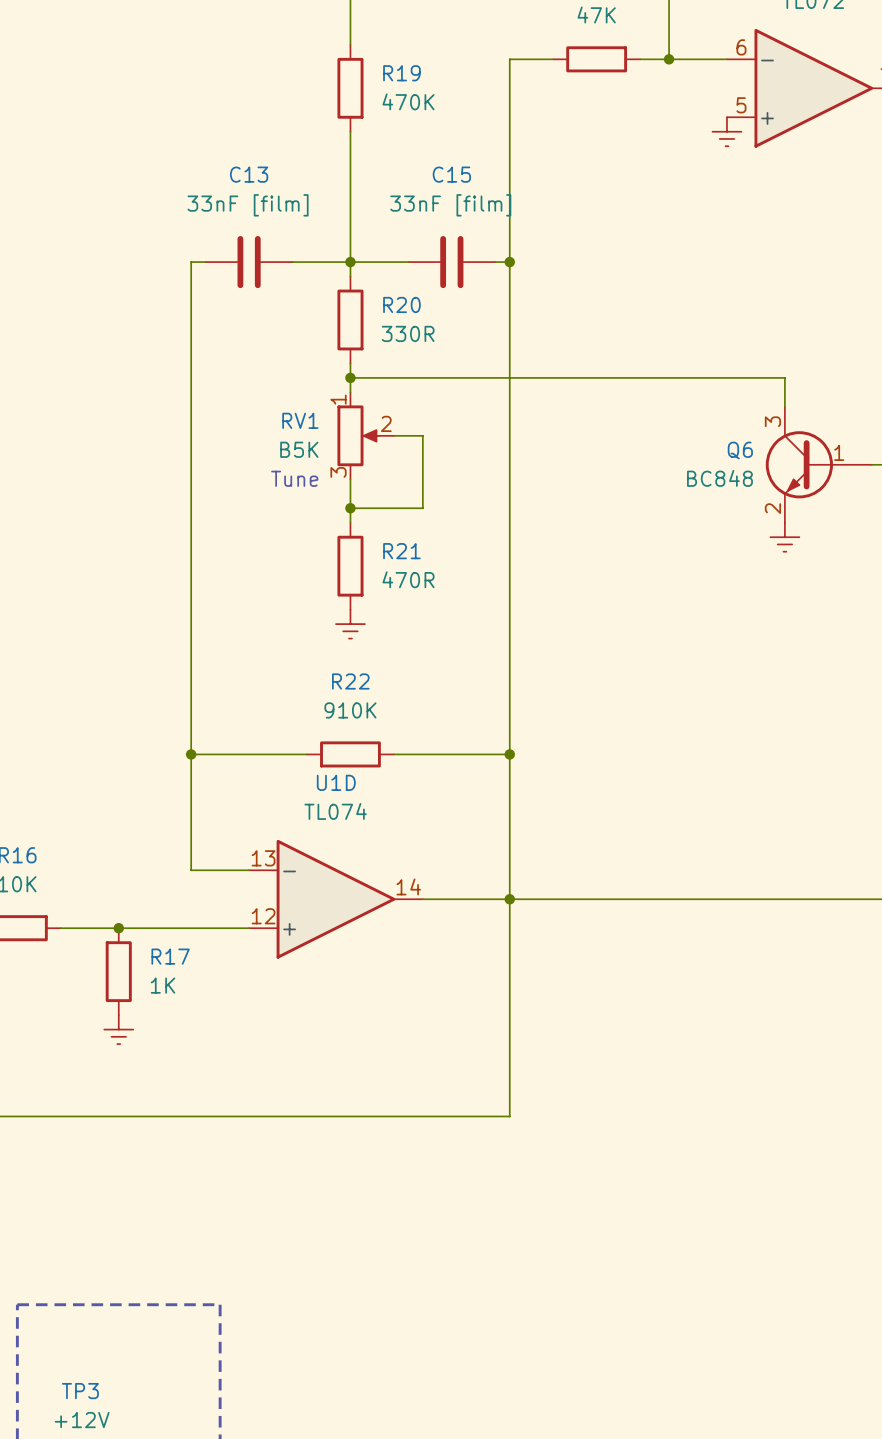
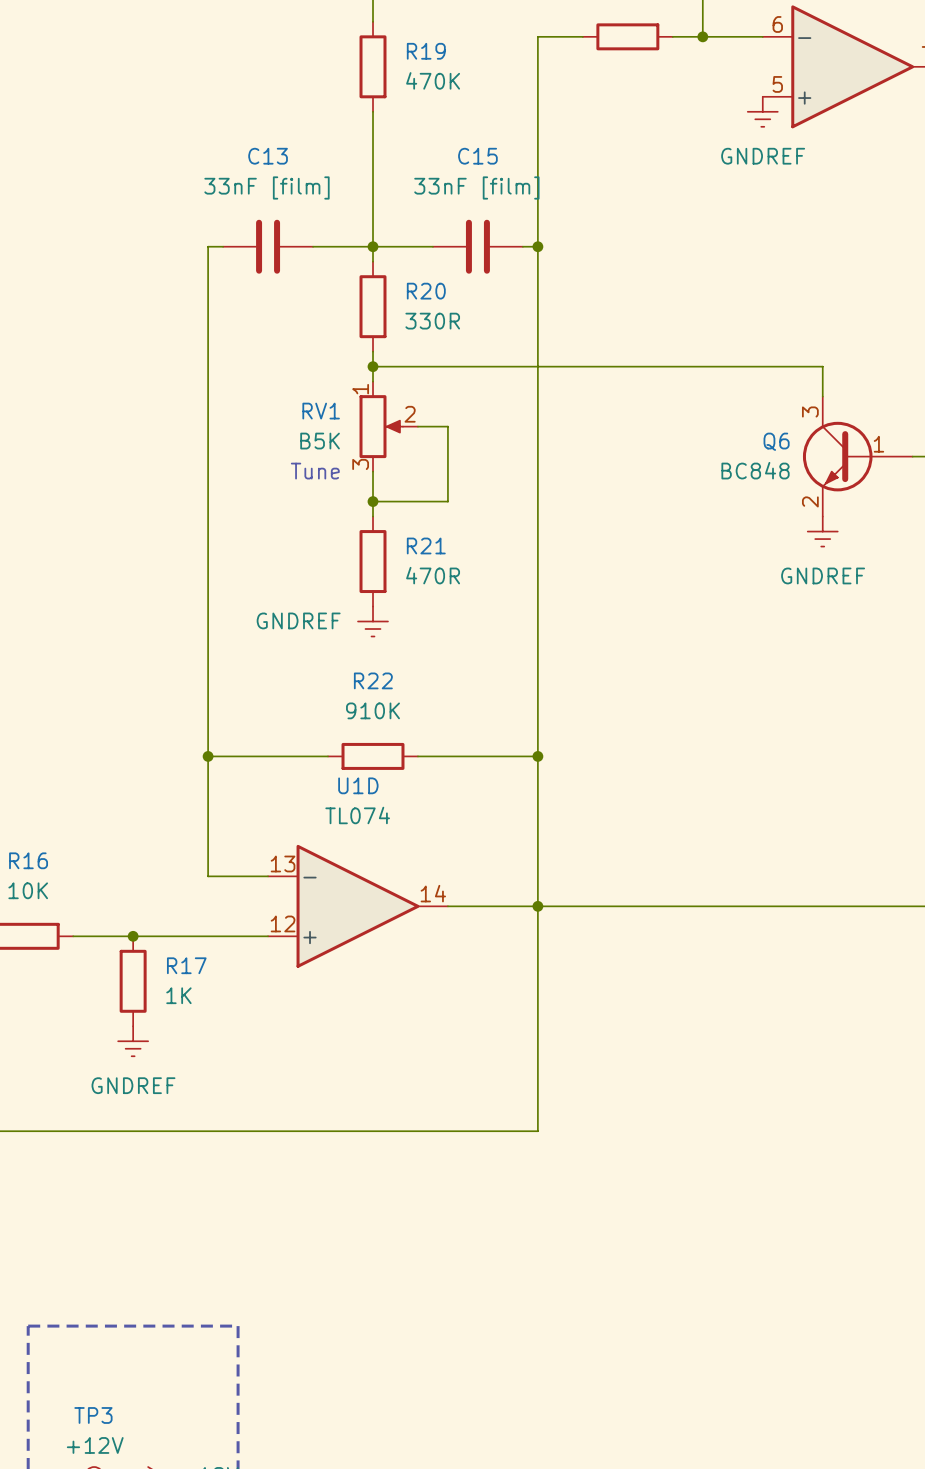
power symbol text: none -> GNDREF (763, 156)
power symbol text: none -> GNDREF (823, 575)
power symbol text: none -> GNDREF (298, 620)
power symbol text: none -> GNDREF (133, 1085)

